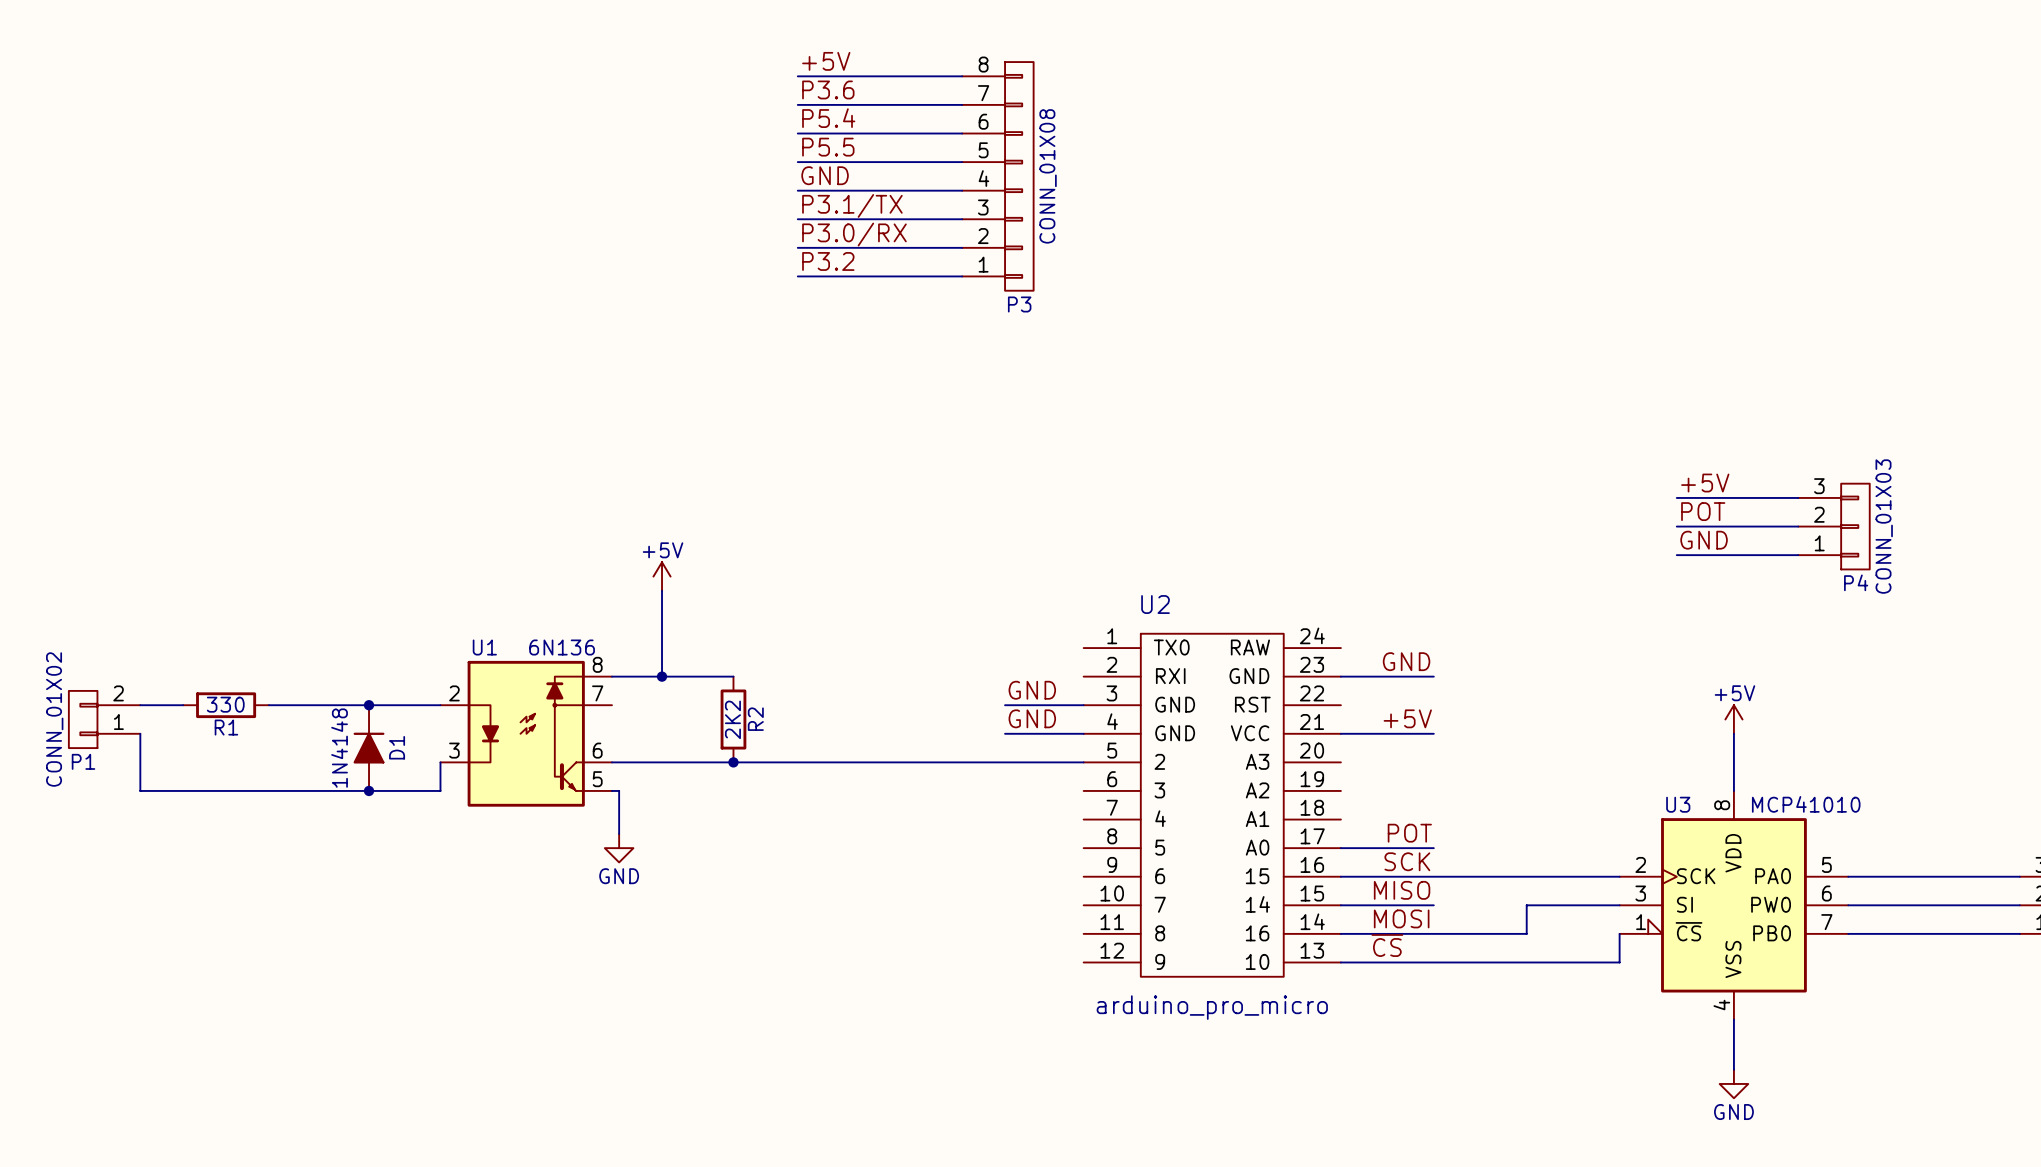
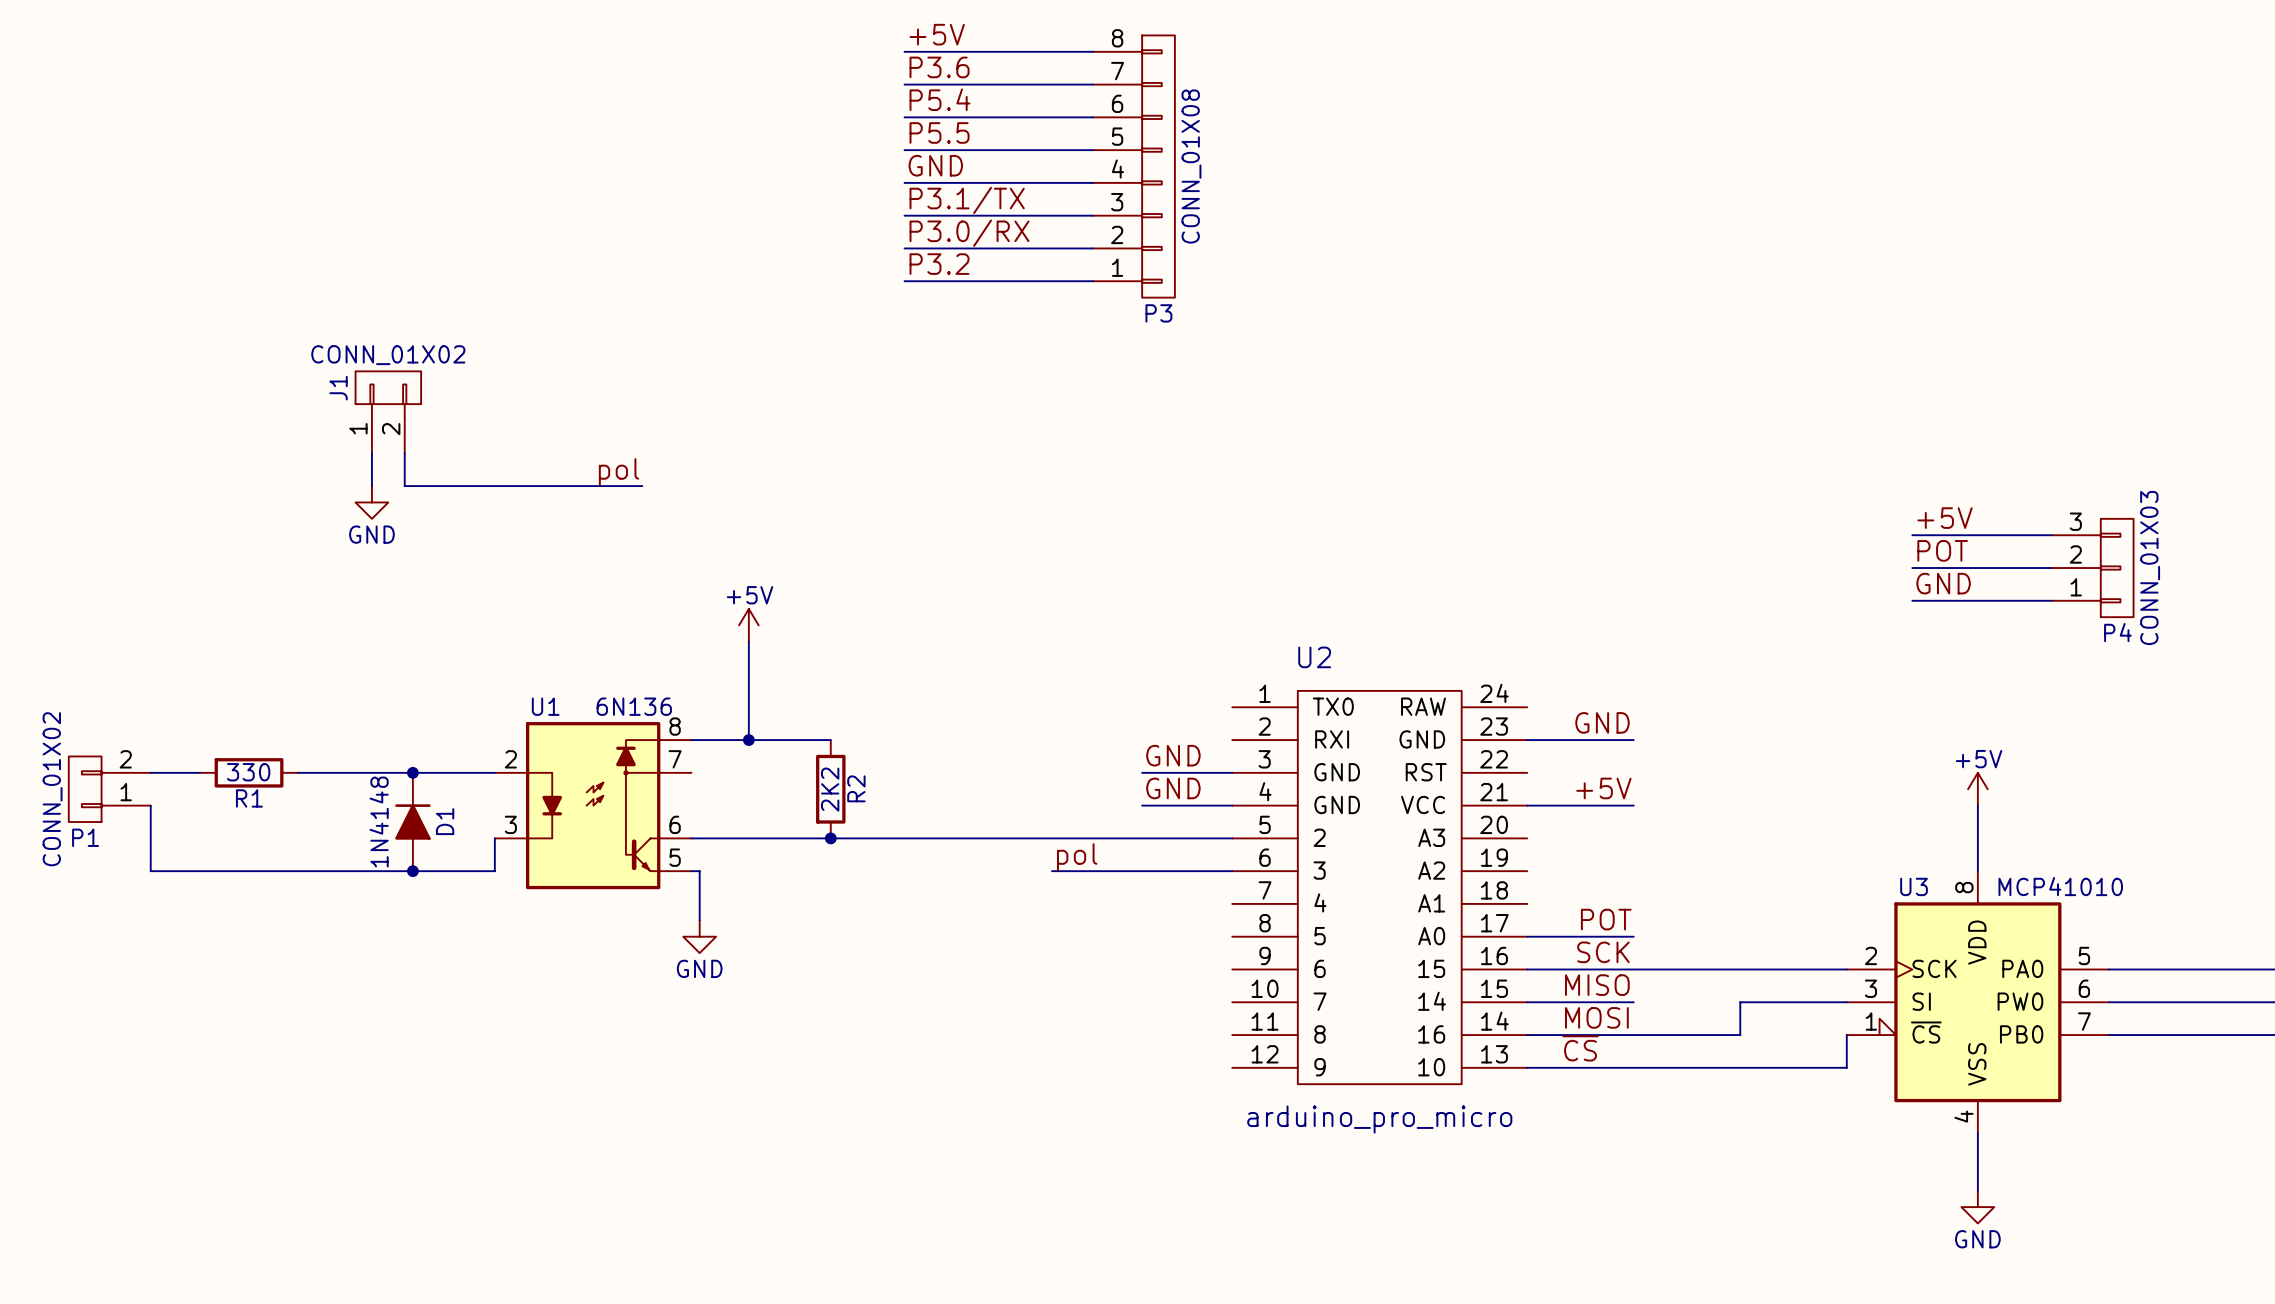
J1: none -> CONN_01X02 (388, 412)
wire: none -> (371, 453) (371, 486)
wire: none -> (404, 453) (404, 486) (642, 486)
label: none -> pol (619, 472)
power symbol: none -> GND (371, 502)
label: none -> pol (1077, 857)
wire: none -> (1052, 871) (1232, 871)

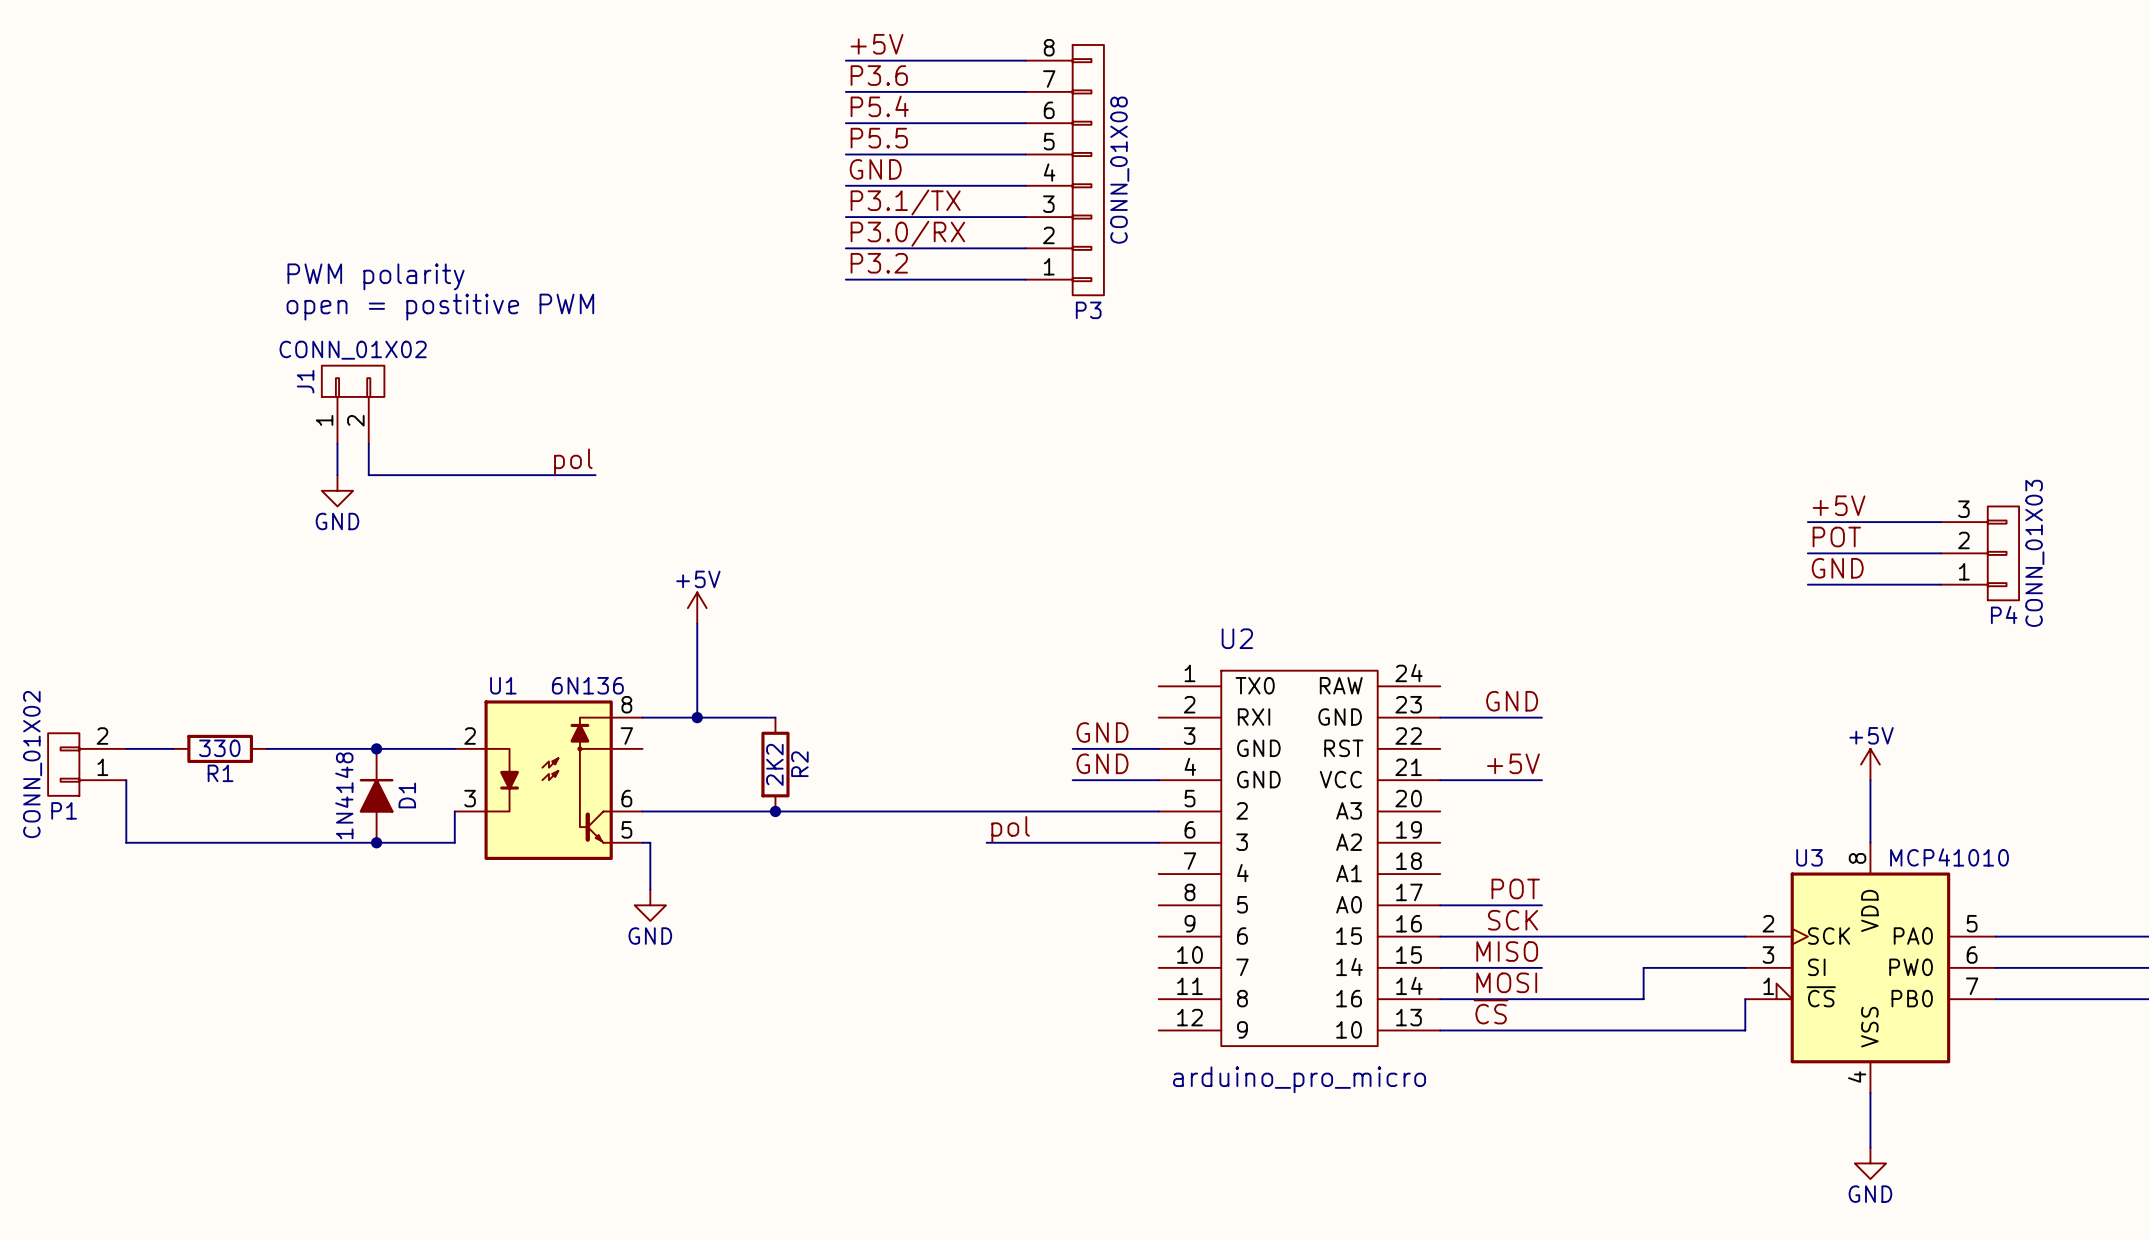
text: none -> PWM polarity (376, 276)
text: none -> open = postitive PWM (440, 307)

